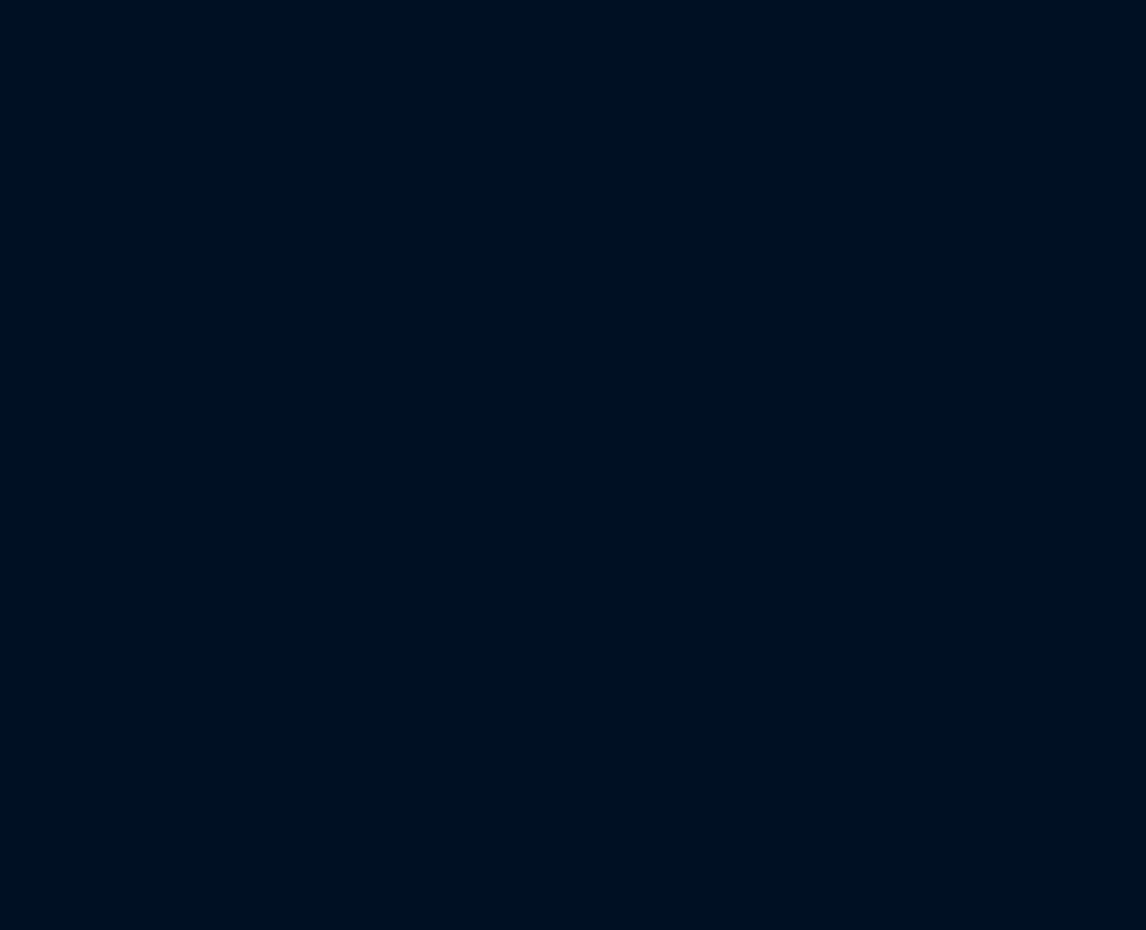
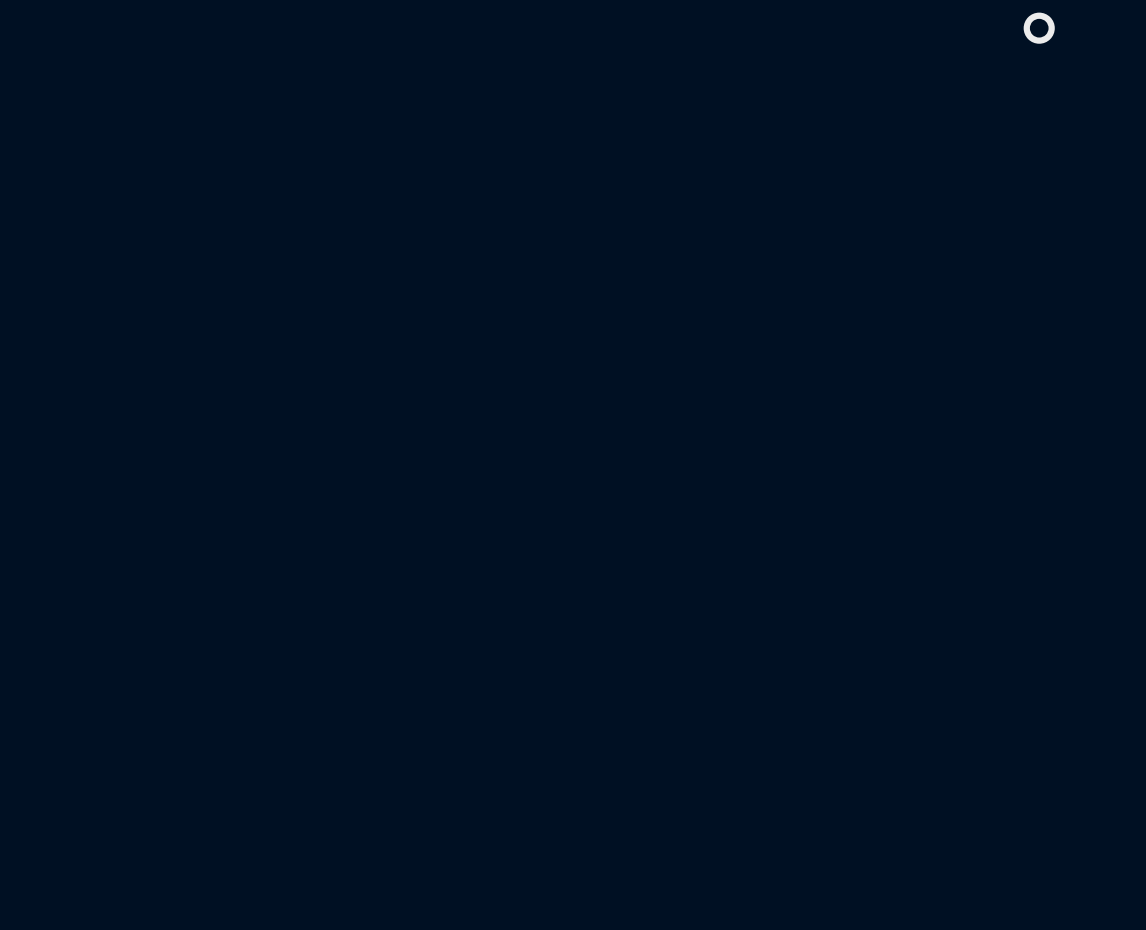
via: none -> (1039, 28)

